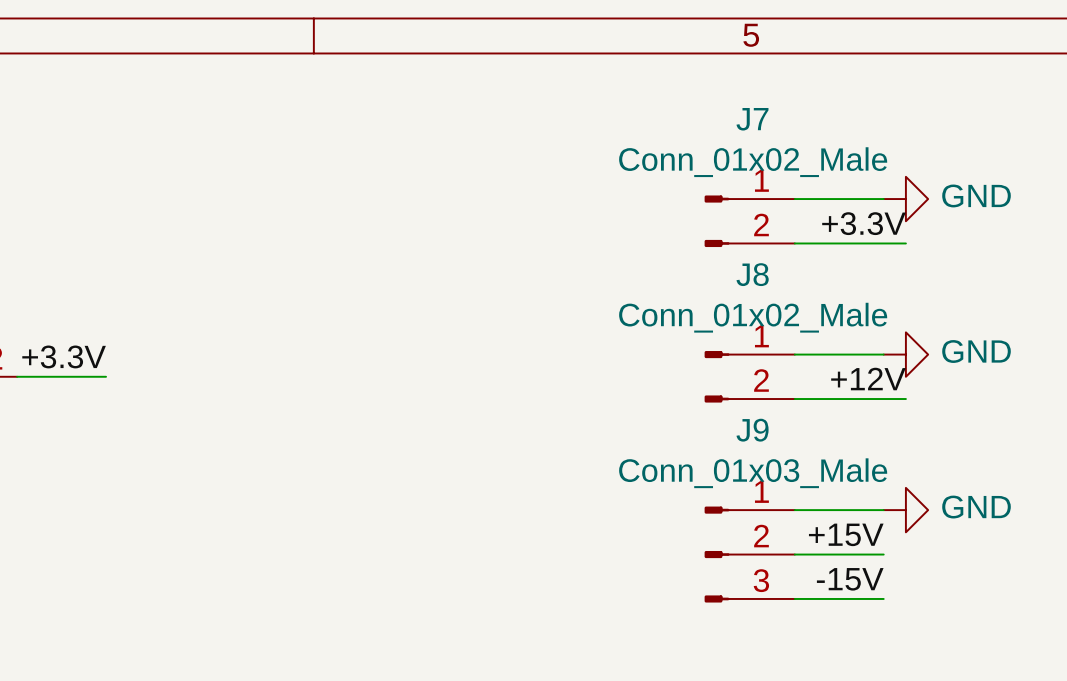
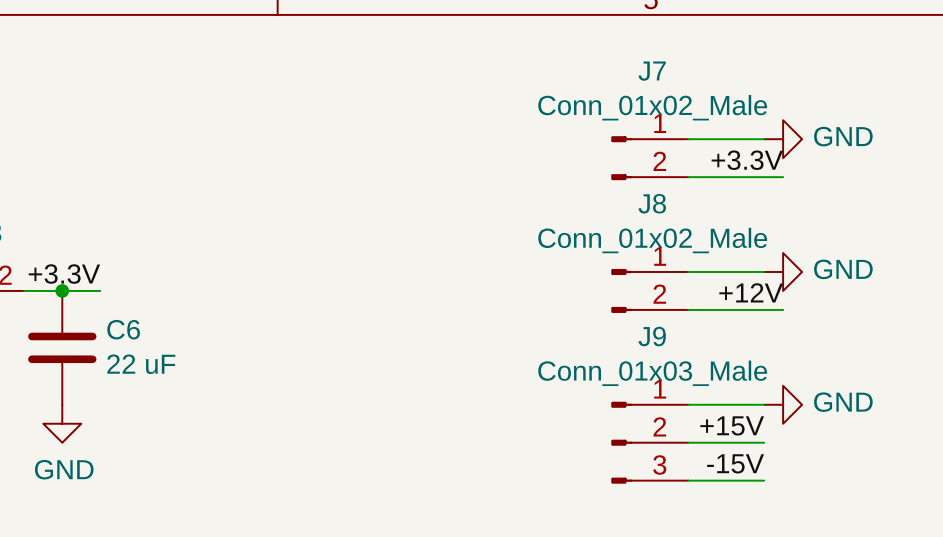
junction: none -> (62, 290)
C6: none -> 22 uF (62, 347)
power symbol: none -> GND (62, 423)

